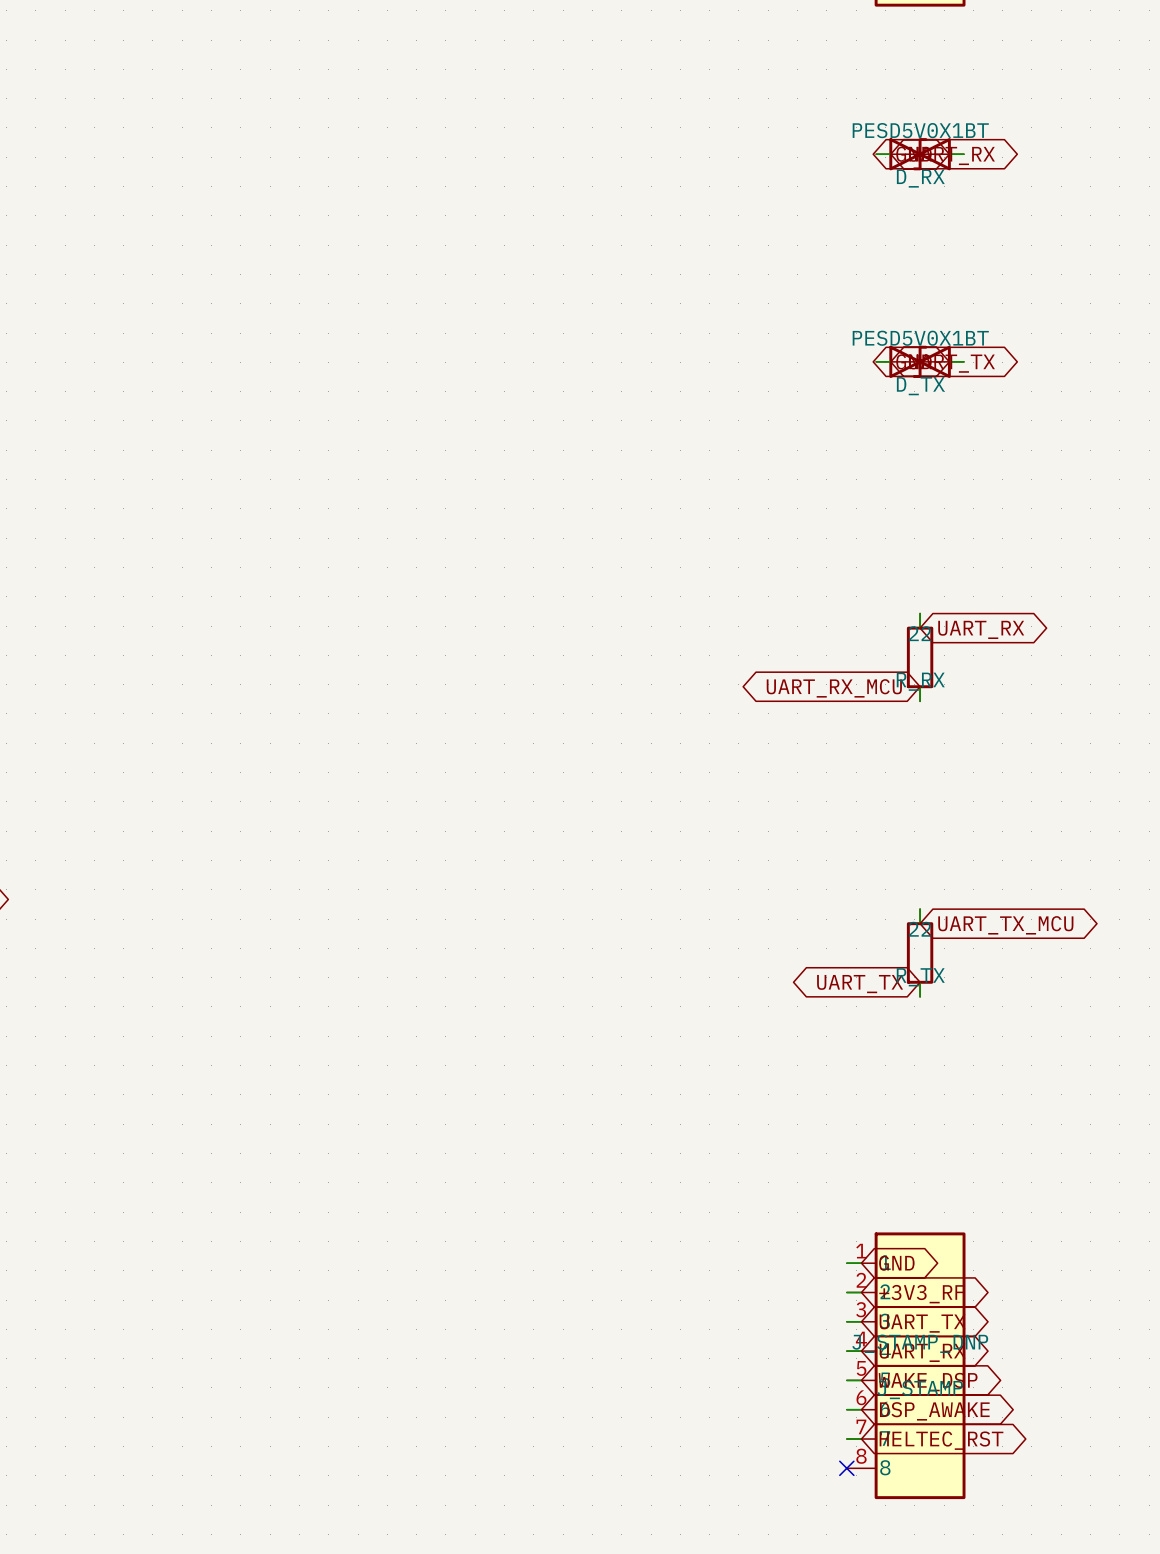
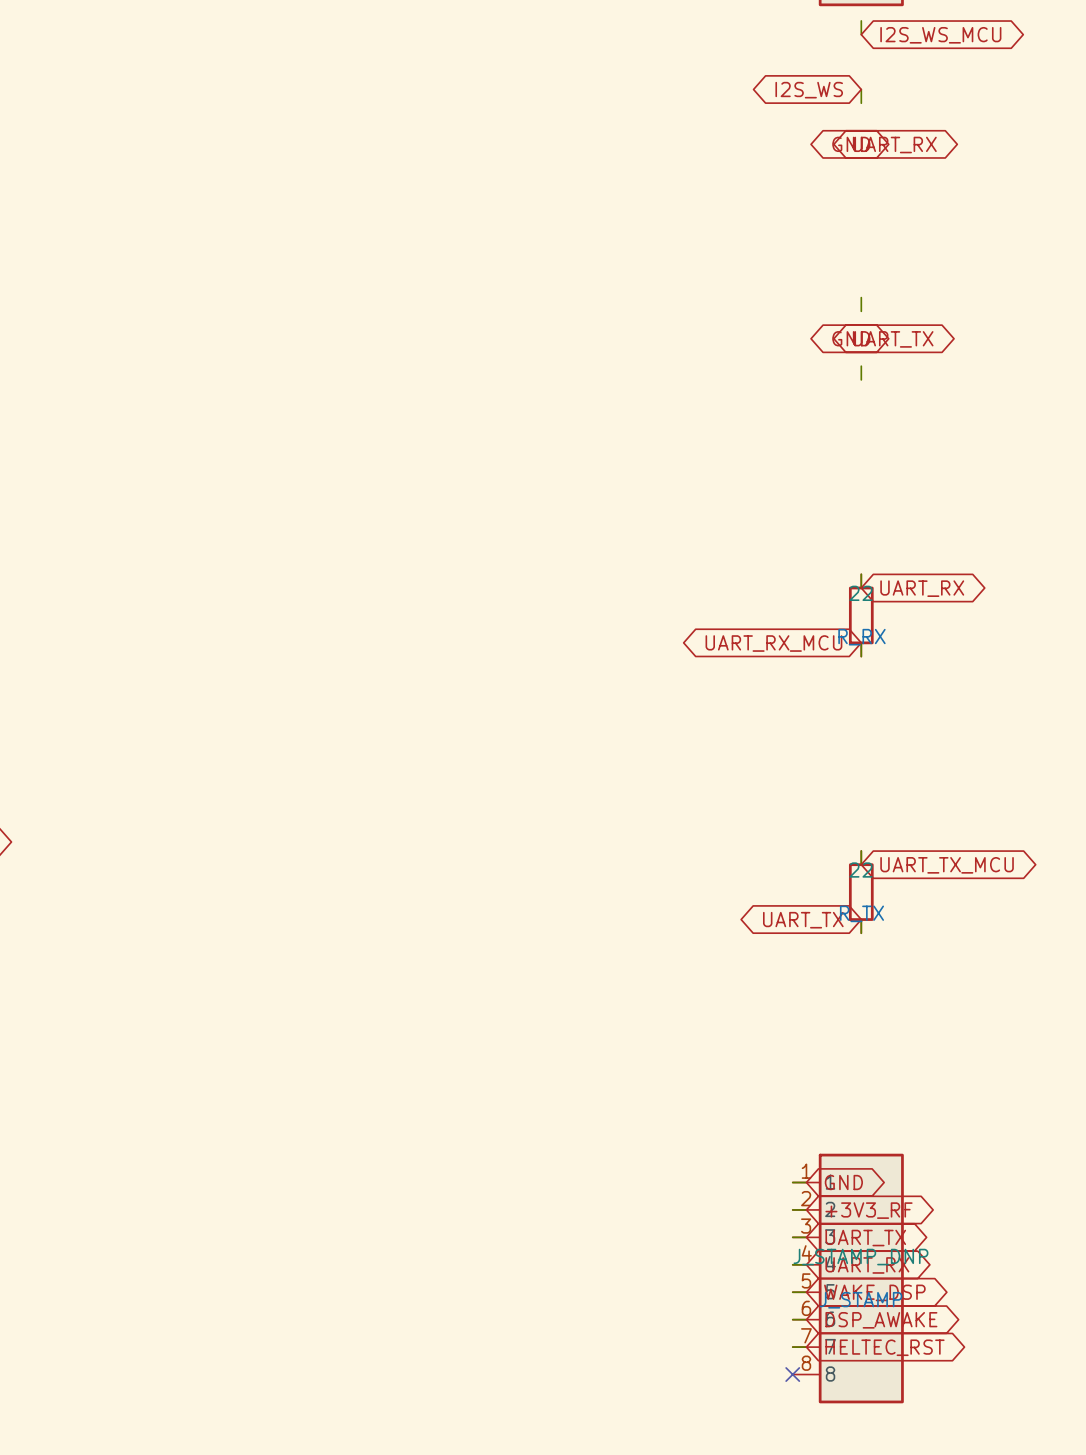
wire: none -> (861, 20) (861, 34)
global label: none -> I2S_WS_MCU (940, 35)
wire: none -> (861, 89) (861, 103)
global label: none -> I2S_WS (809, 90)
wire: (876, 154) (890, 154) -> none
D_RX: PESD5V0X1BT (920, 154) -> none
wire: (949, 154) (964, 154) -> none
wire: none -> (861, 297) (861, 311)
wire: (876, 361) (890, 361) -> none
D_TX: PESD5V0X1BT (920, 361) -> none
wire: (949, 361) (964, 361) -> none
wire: none -> (861, 366) (861, 379)

